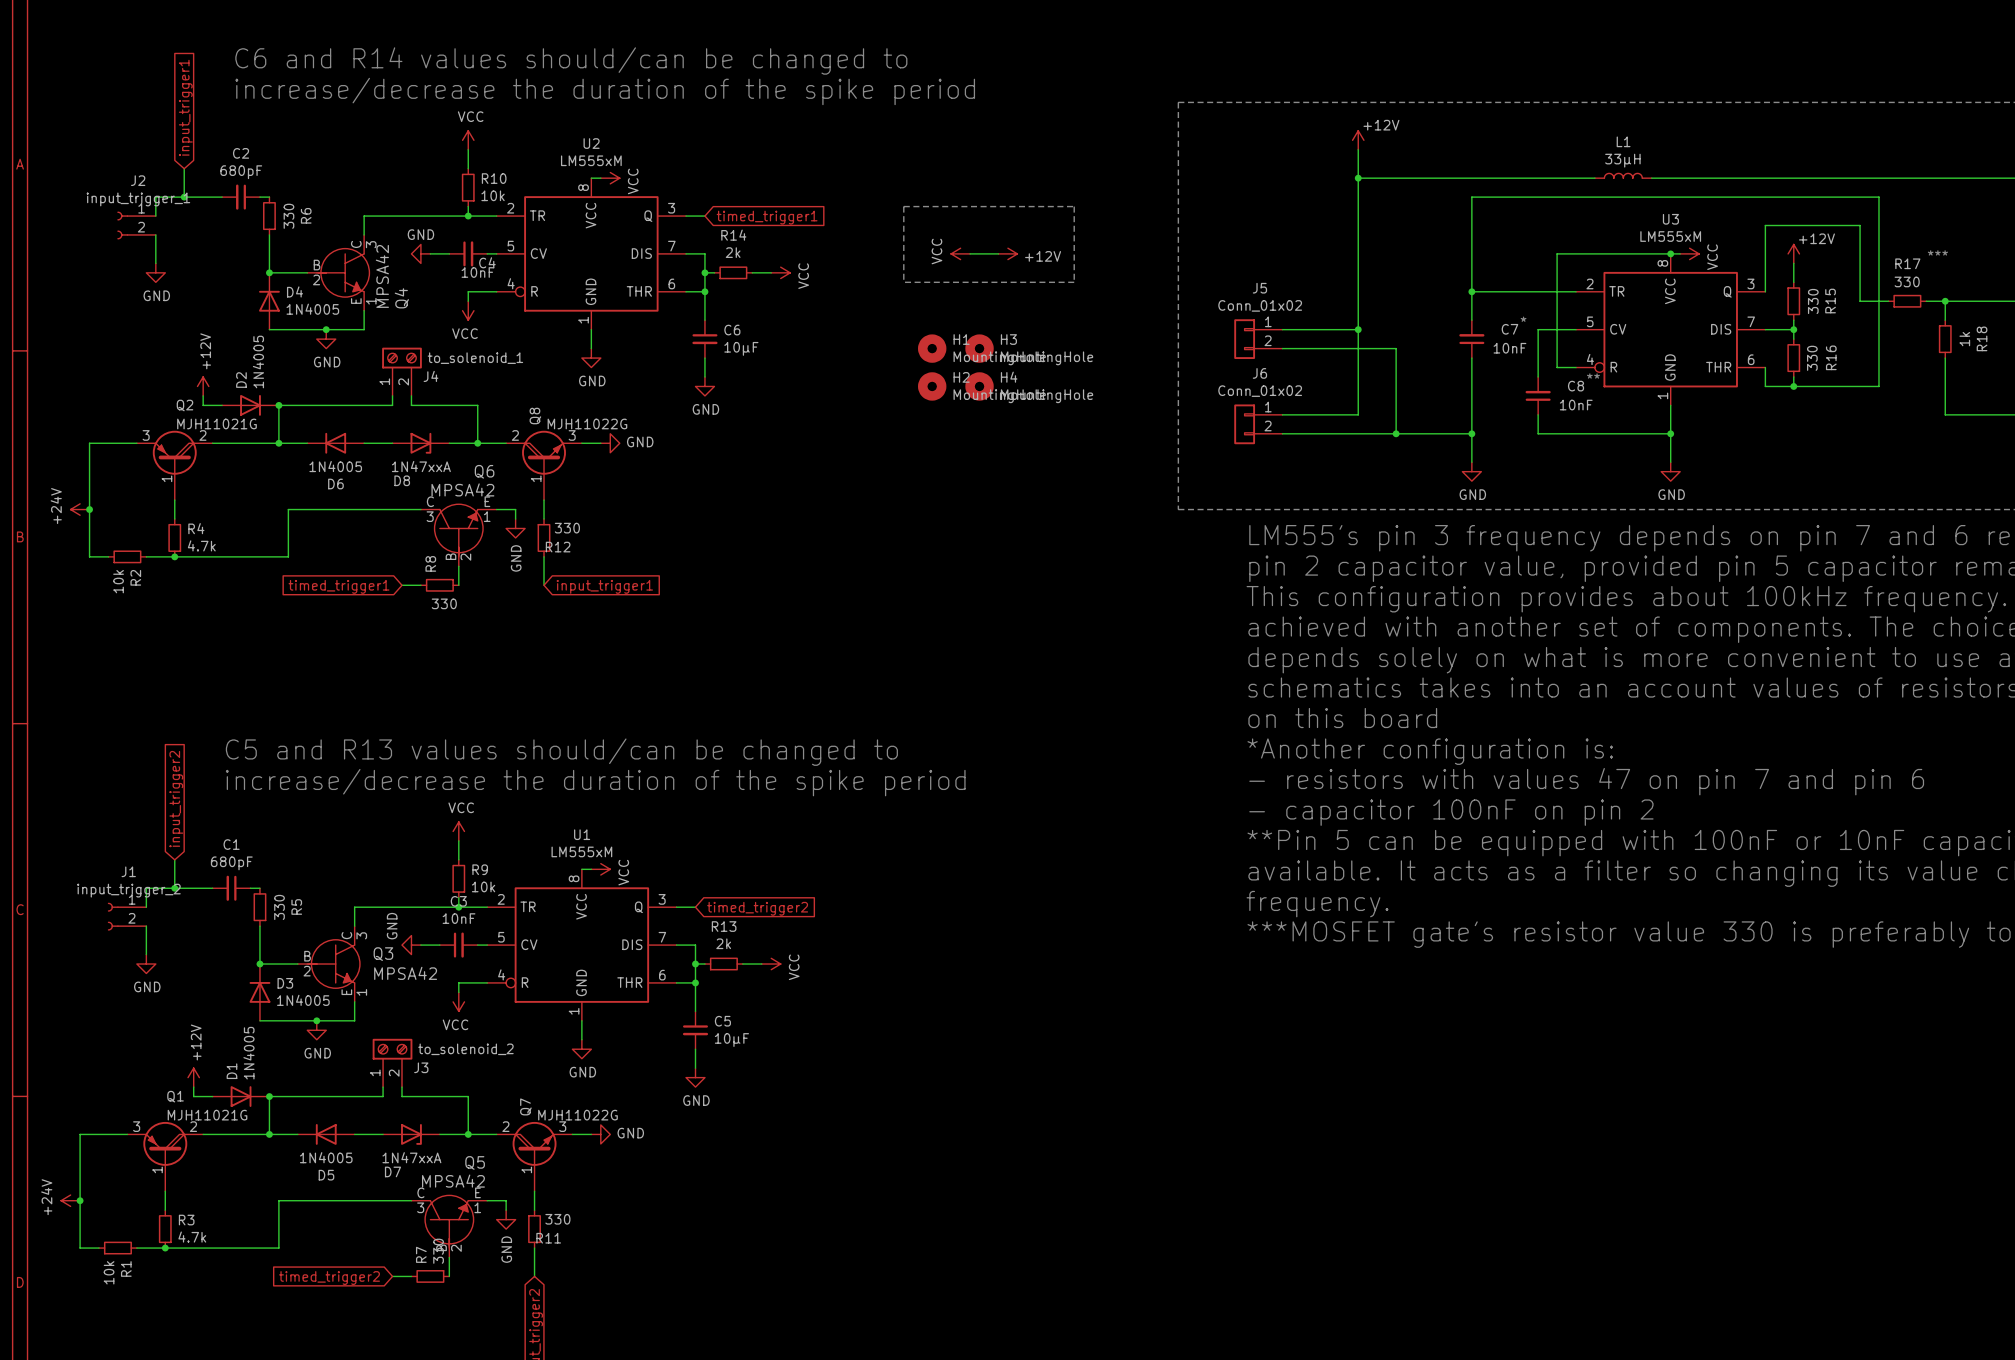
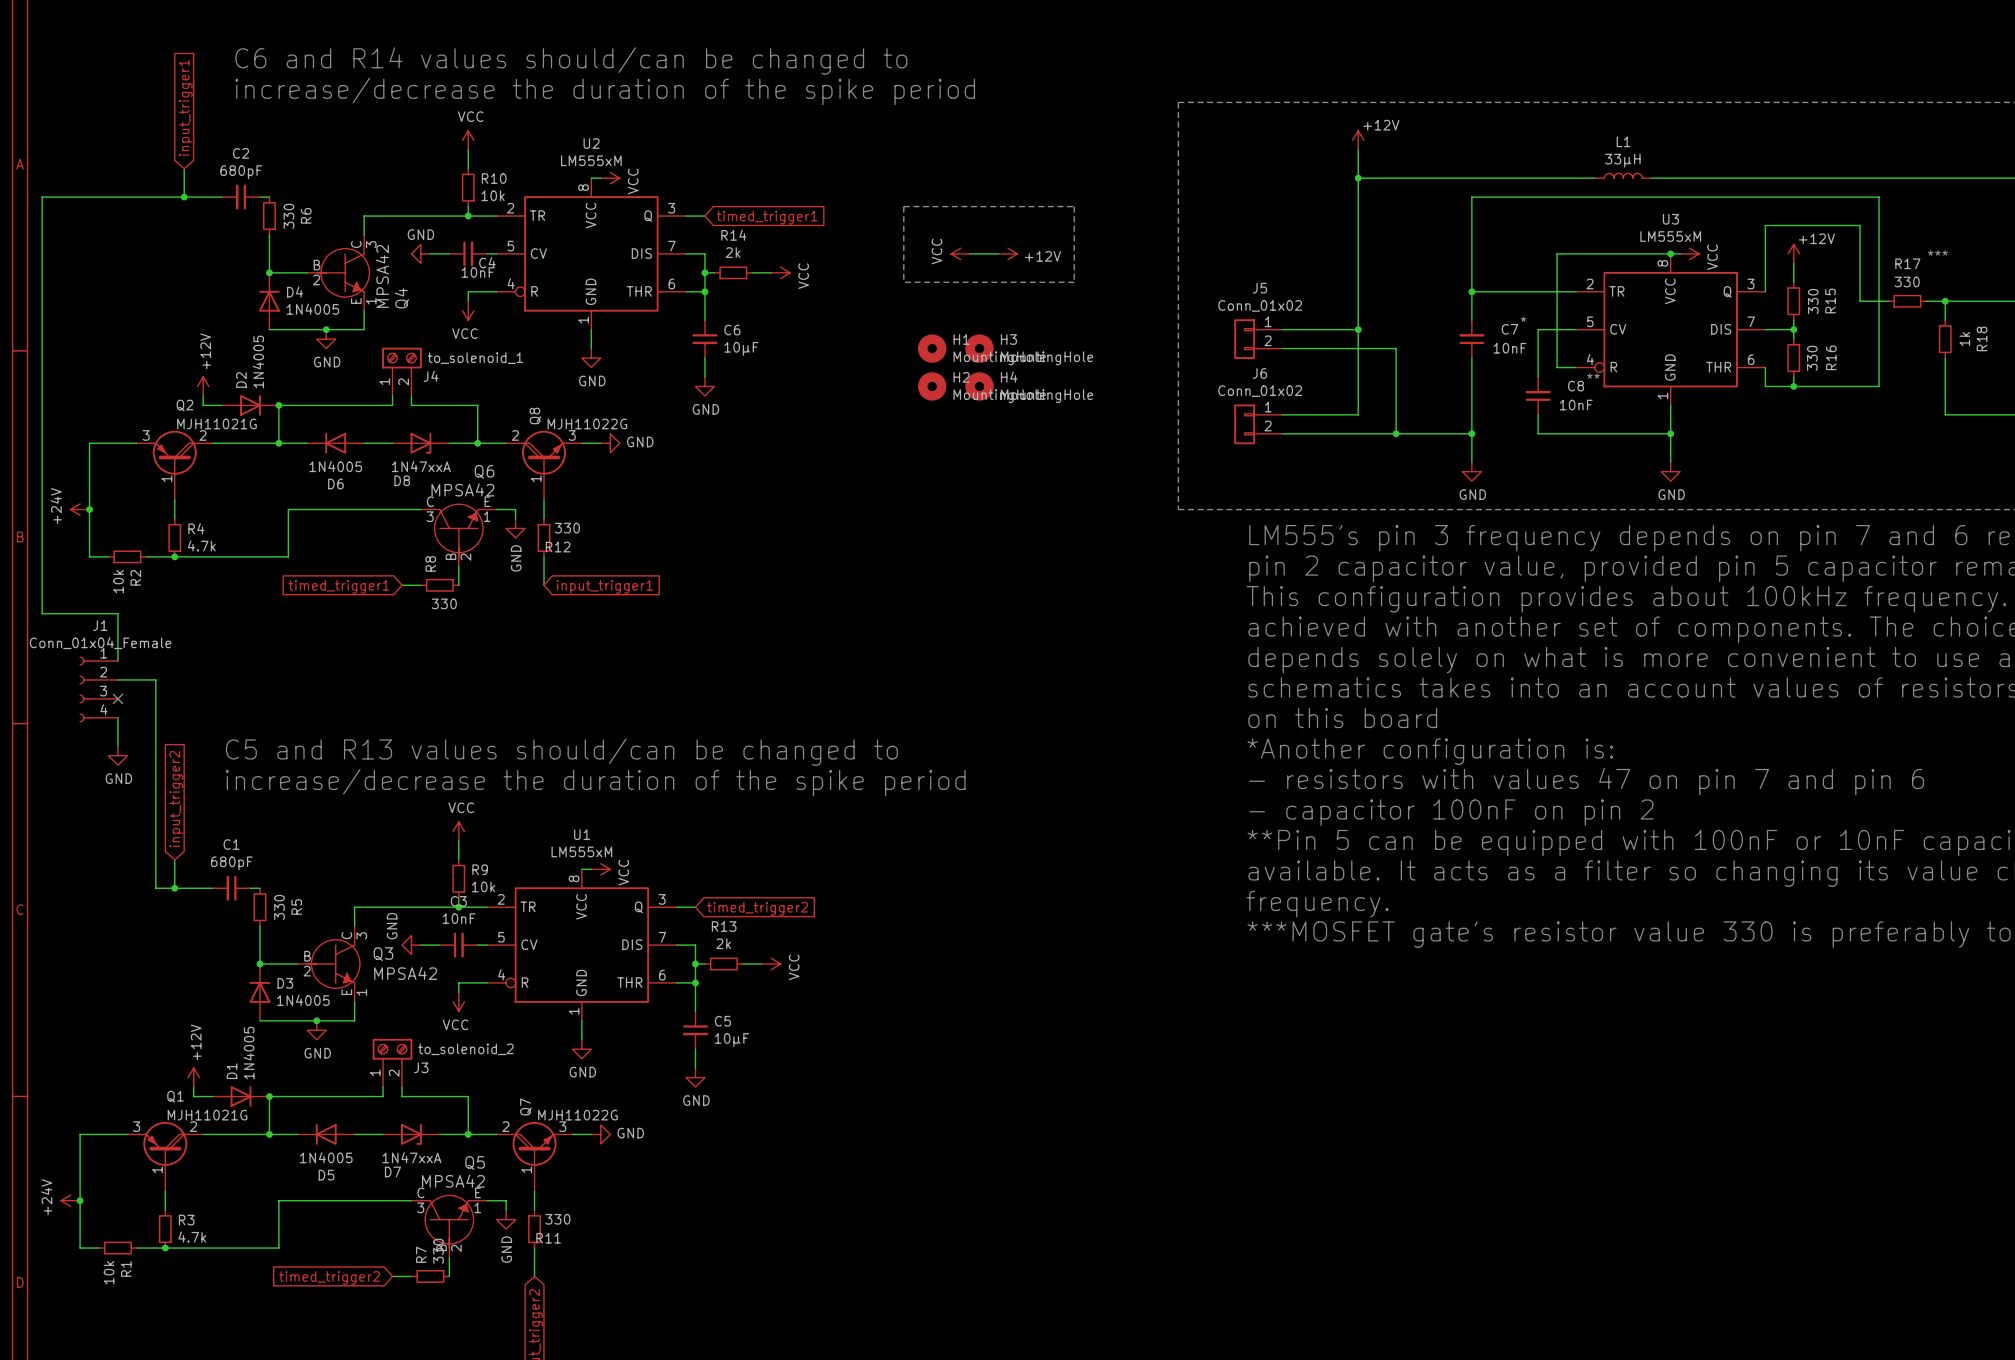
wire: (155, 197) (155, 216) -> (155, 197) (42, 197) (42, 613) (117, 613) (117, 661)
J2: input_trigger_1 (136, 225) -> none
wire: (155, 234) (155, 263) -> none
power symbol: GND (155, 272) -> none
no-connect mark: none -> (117, 698)
wire: none -> (117, 717) (117, 746)
power symbol: none -> GND (117, 755)
J1 name position: J1 (128, 871) -> J1 (100, 625)
wire: (155, 888) (146, 888) (146, 907) -> (155, 888) (155, 679) (117, 679)
J1 value: input_trigger_2 (128, 890) -> Conn_01x04_Female (100, 643)
J1 symbol: [107, 902, 147, 931] -> [79, 656, 118, 723]
wire: (146, 926) (146, 954) -> none
power symbol: GND (146, 964) -> none

